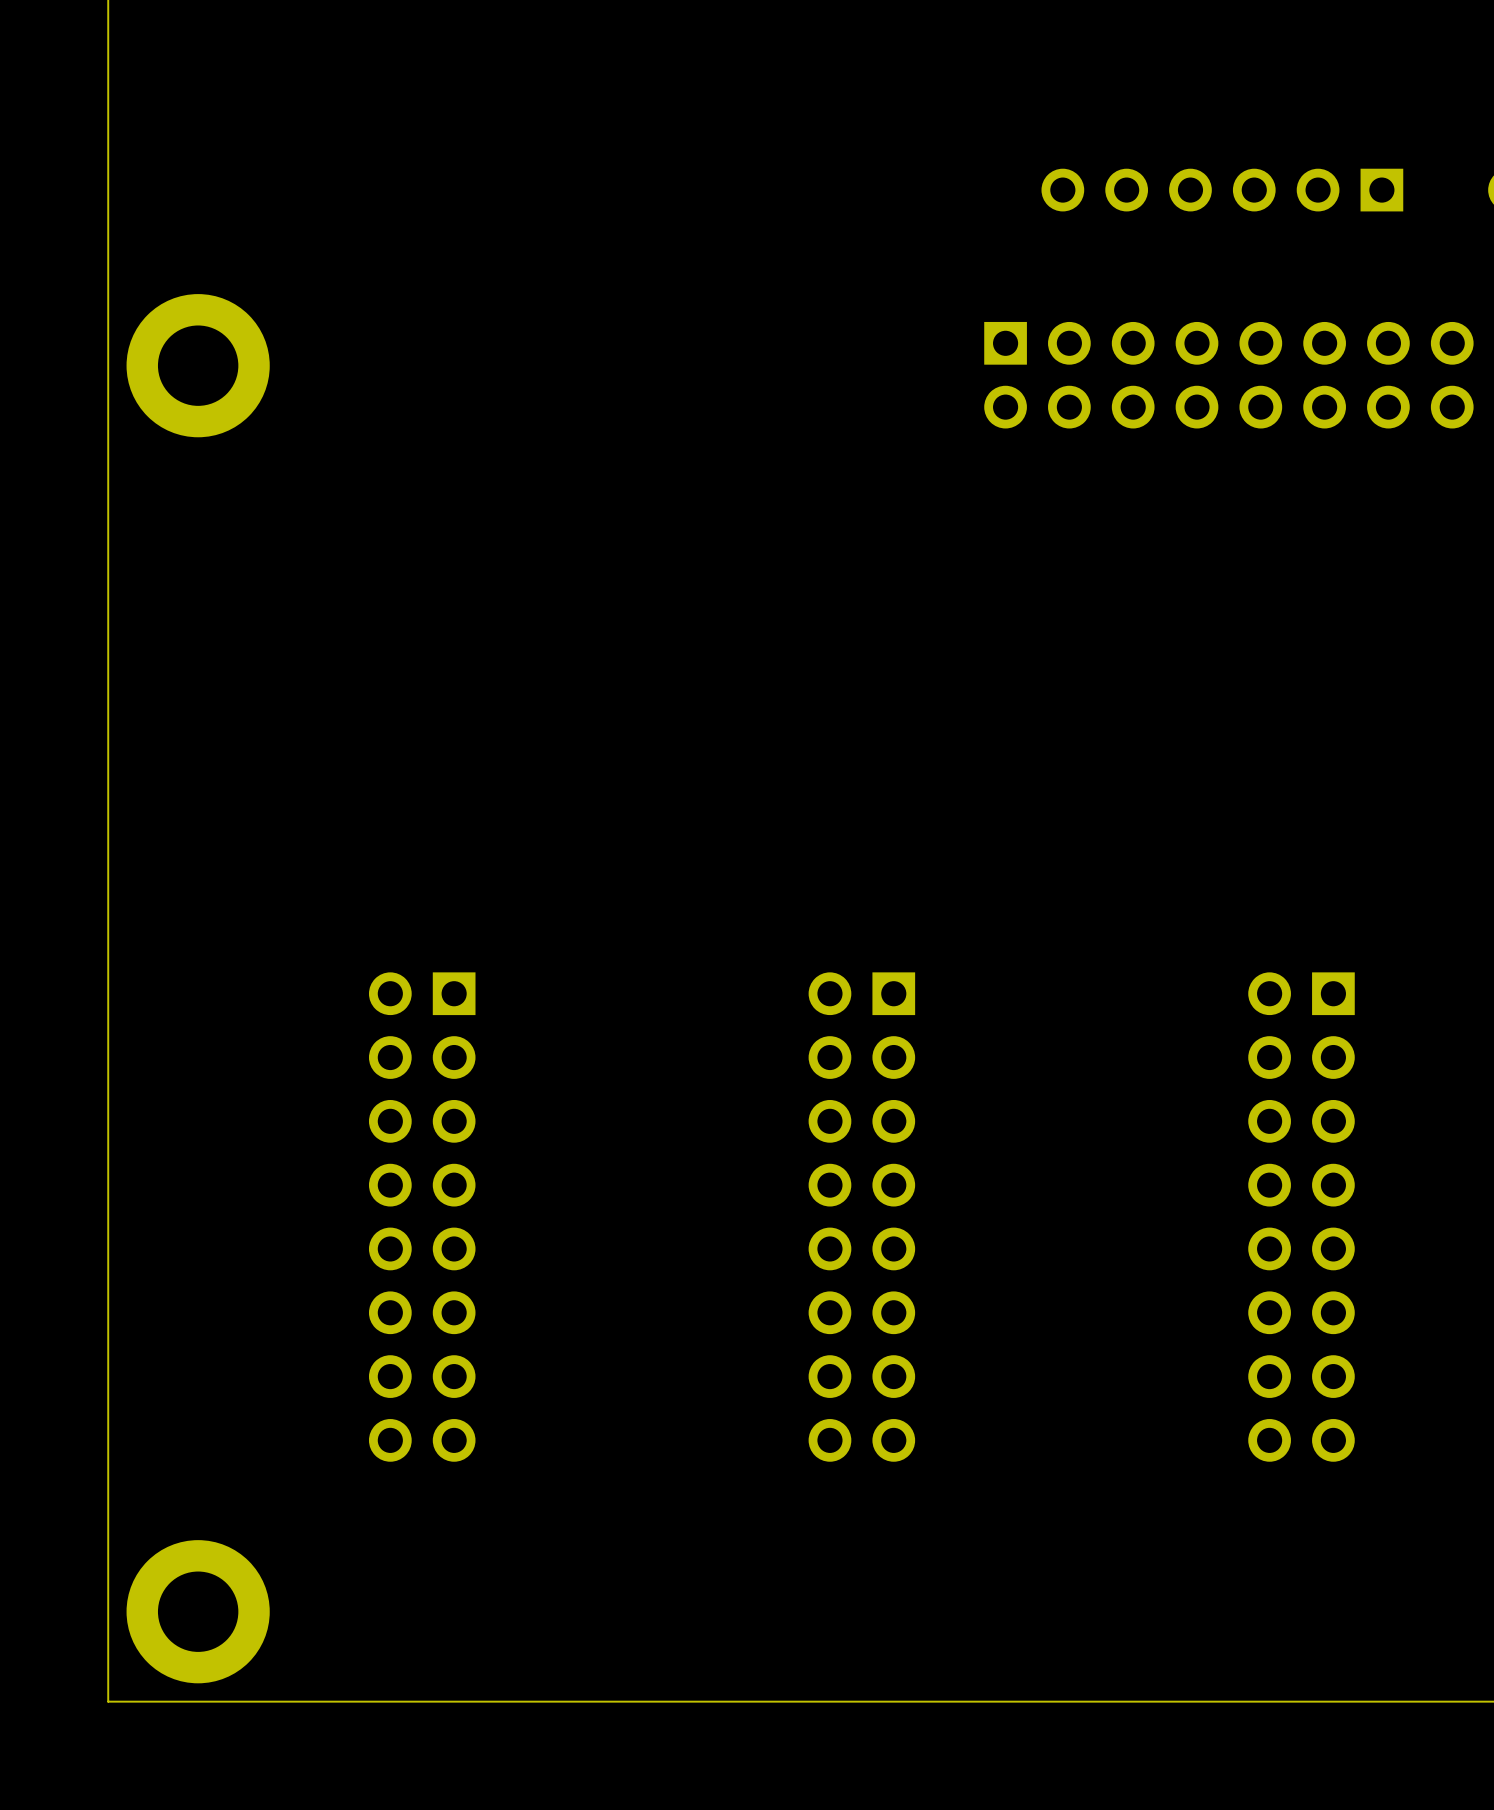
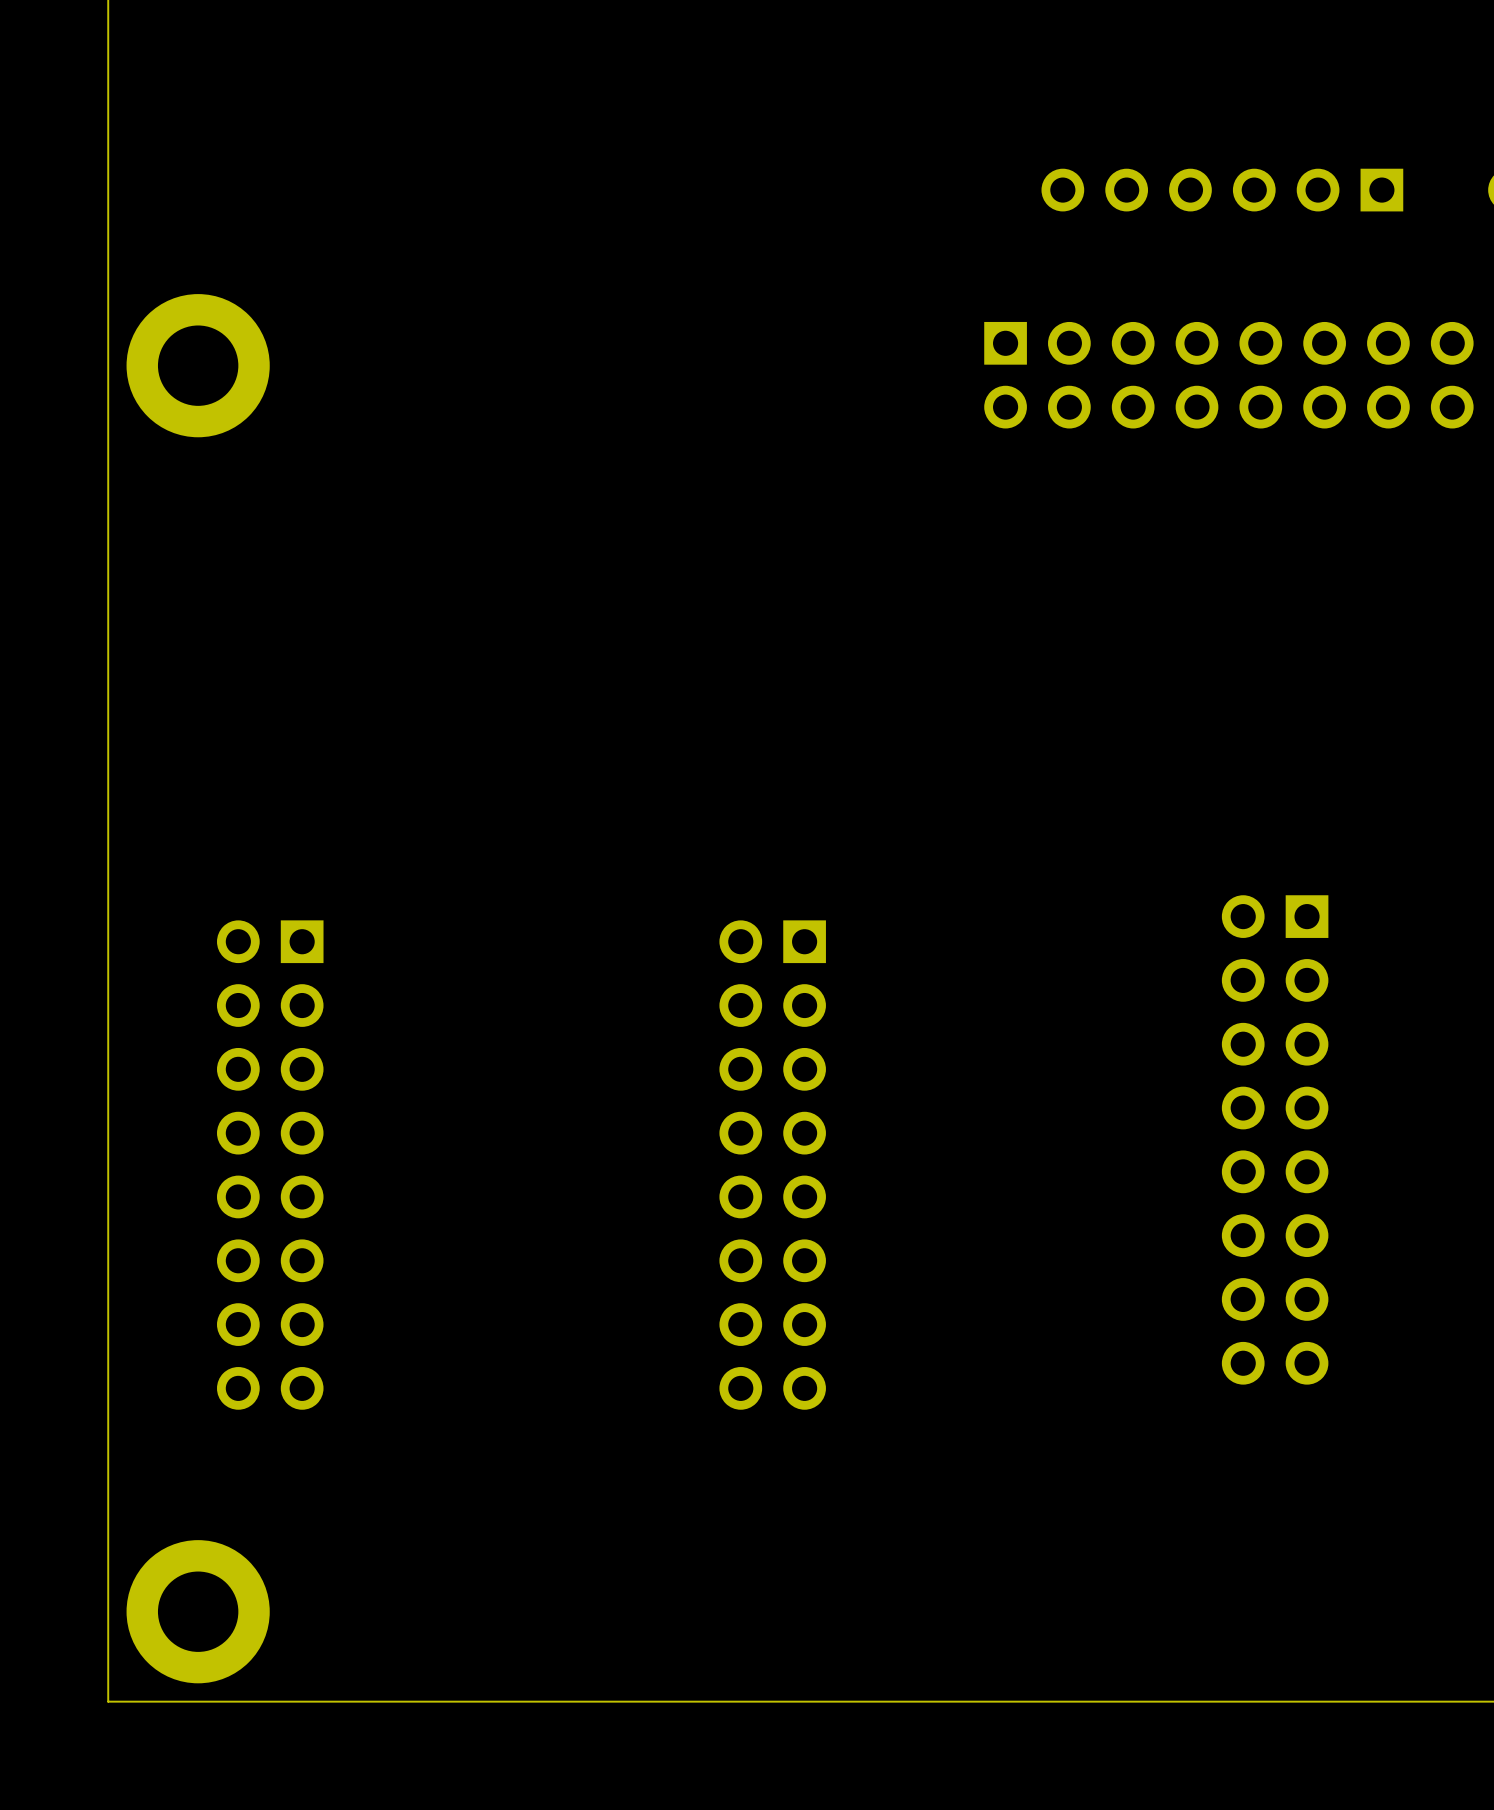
part position: (422, 1217) -> (270, 1165)
part position: (861, 1217) -> (772, 1165)
part position: (1301, 1217) -> (1275, 1139)

